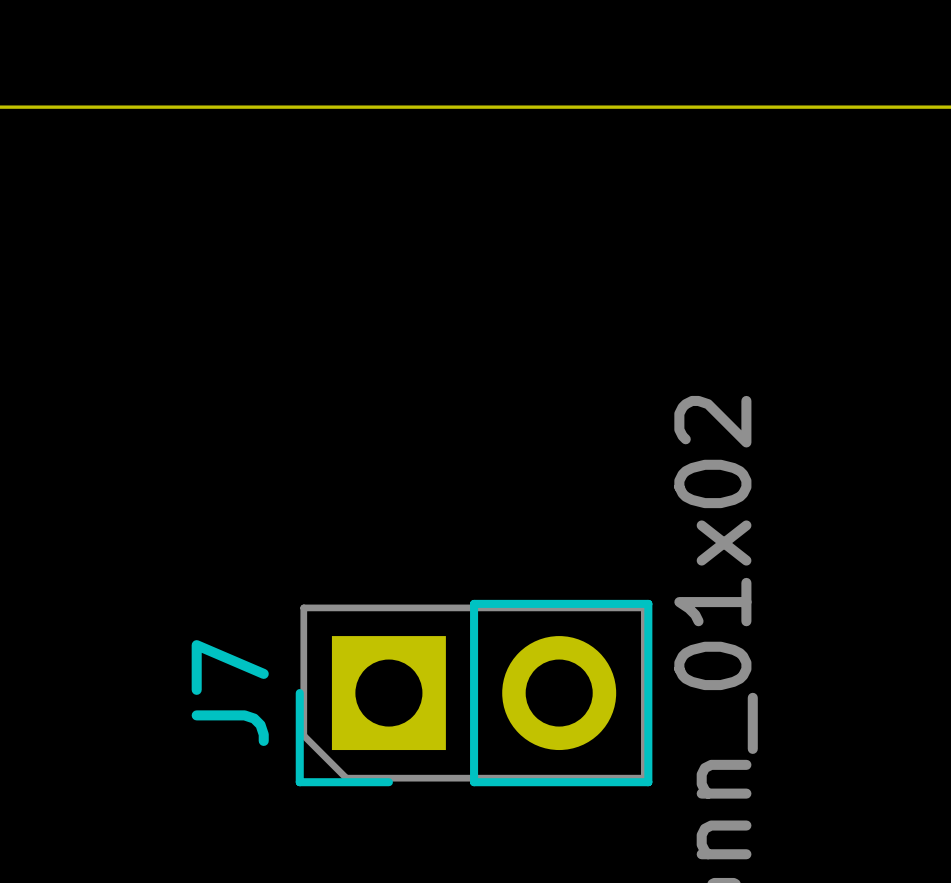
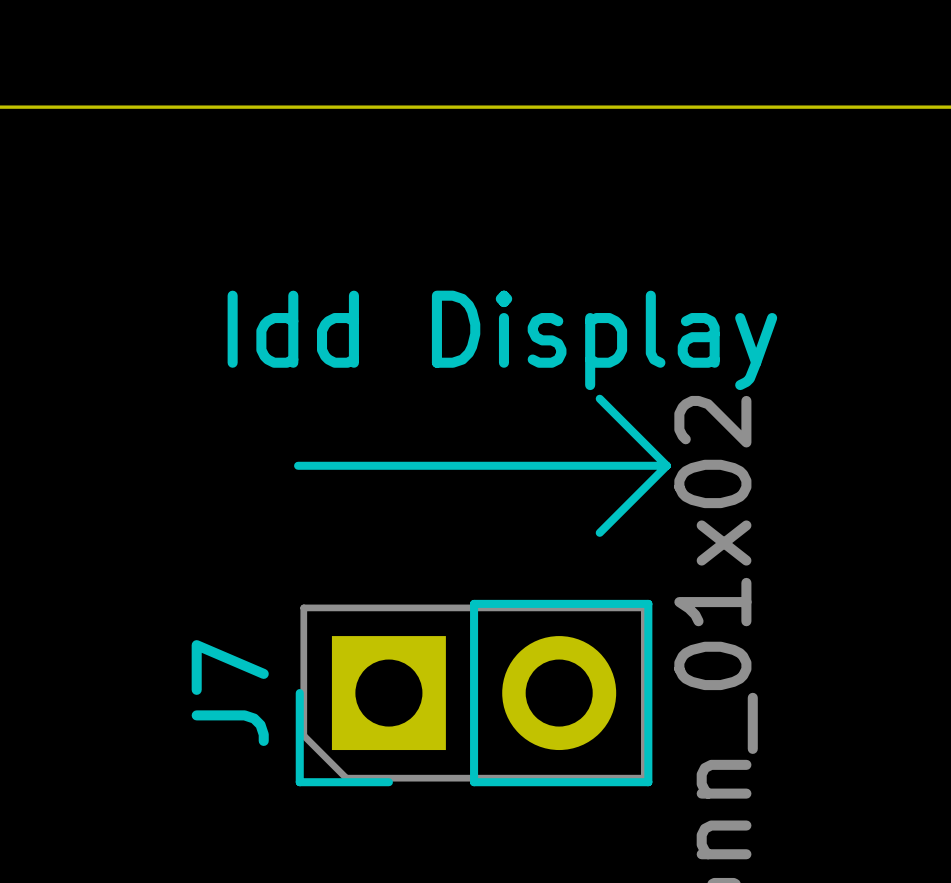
text: none -> Idd Display (502, 340)
line: none -> (599, 398) (666, 465)
line: none -> (298, 465) (666, 465)
line: none -> (666, 465) (599, 532)

